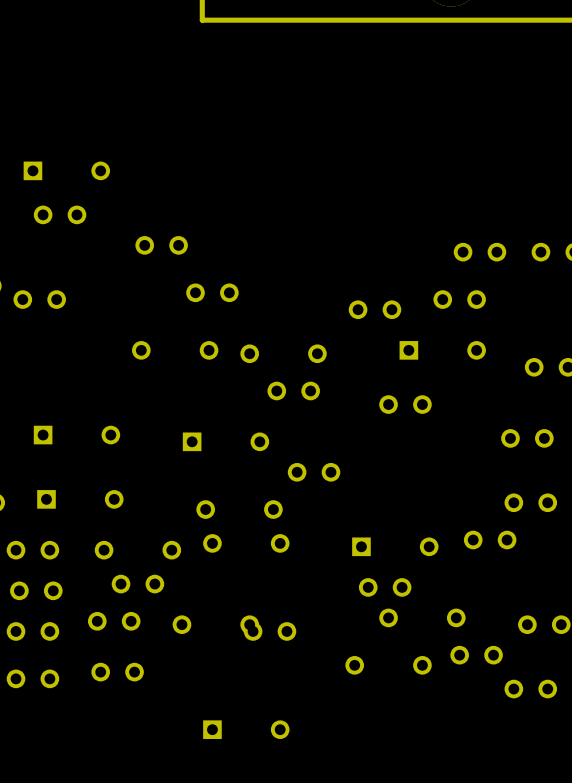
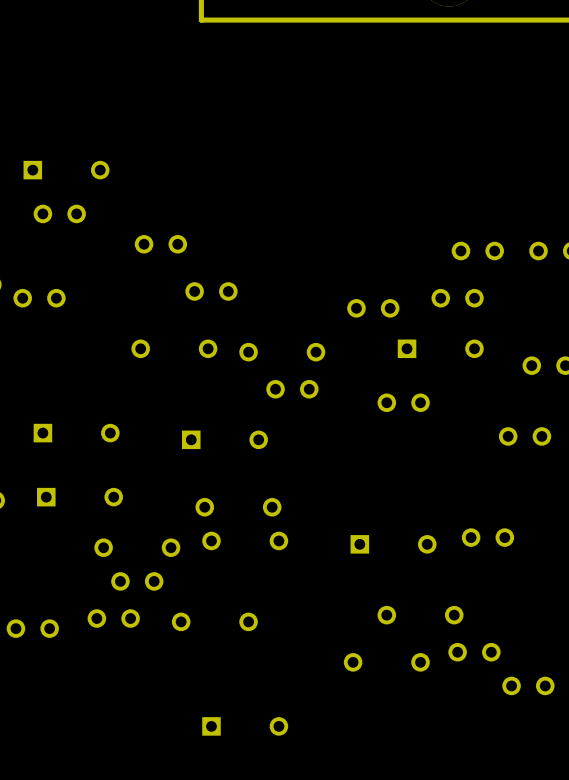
part: (314, 472) -> none
part: (530, 502) -> none
part: (32, 550) -> none
part: (385, 587) -> none
part: (36, 590) -> none
part: (544, 624) -> none
part: (270, 631) -> none
part: (117, 672) -> none
part: (32, 678) -> none

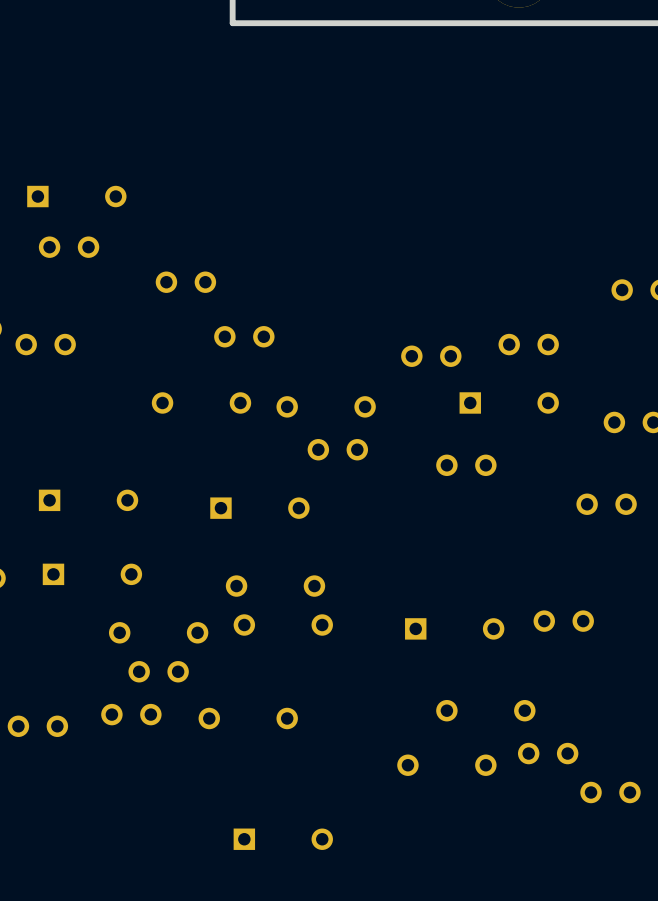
part: (477, 251) -> none

